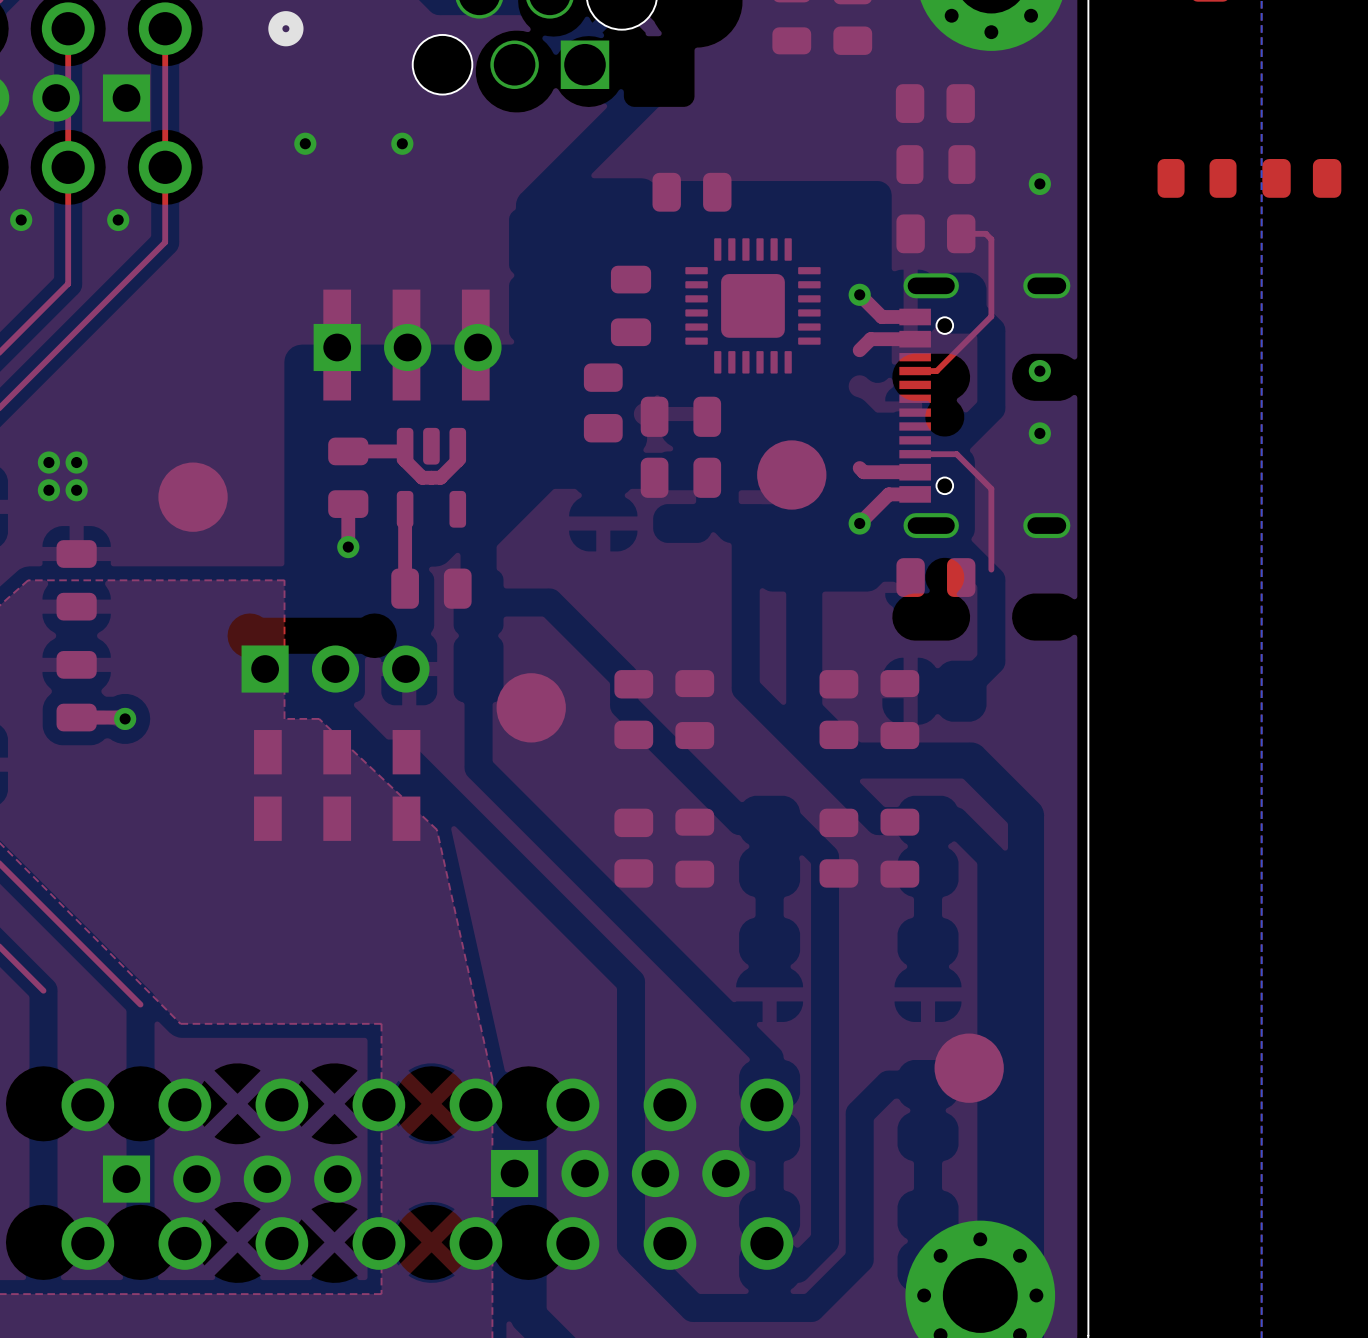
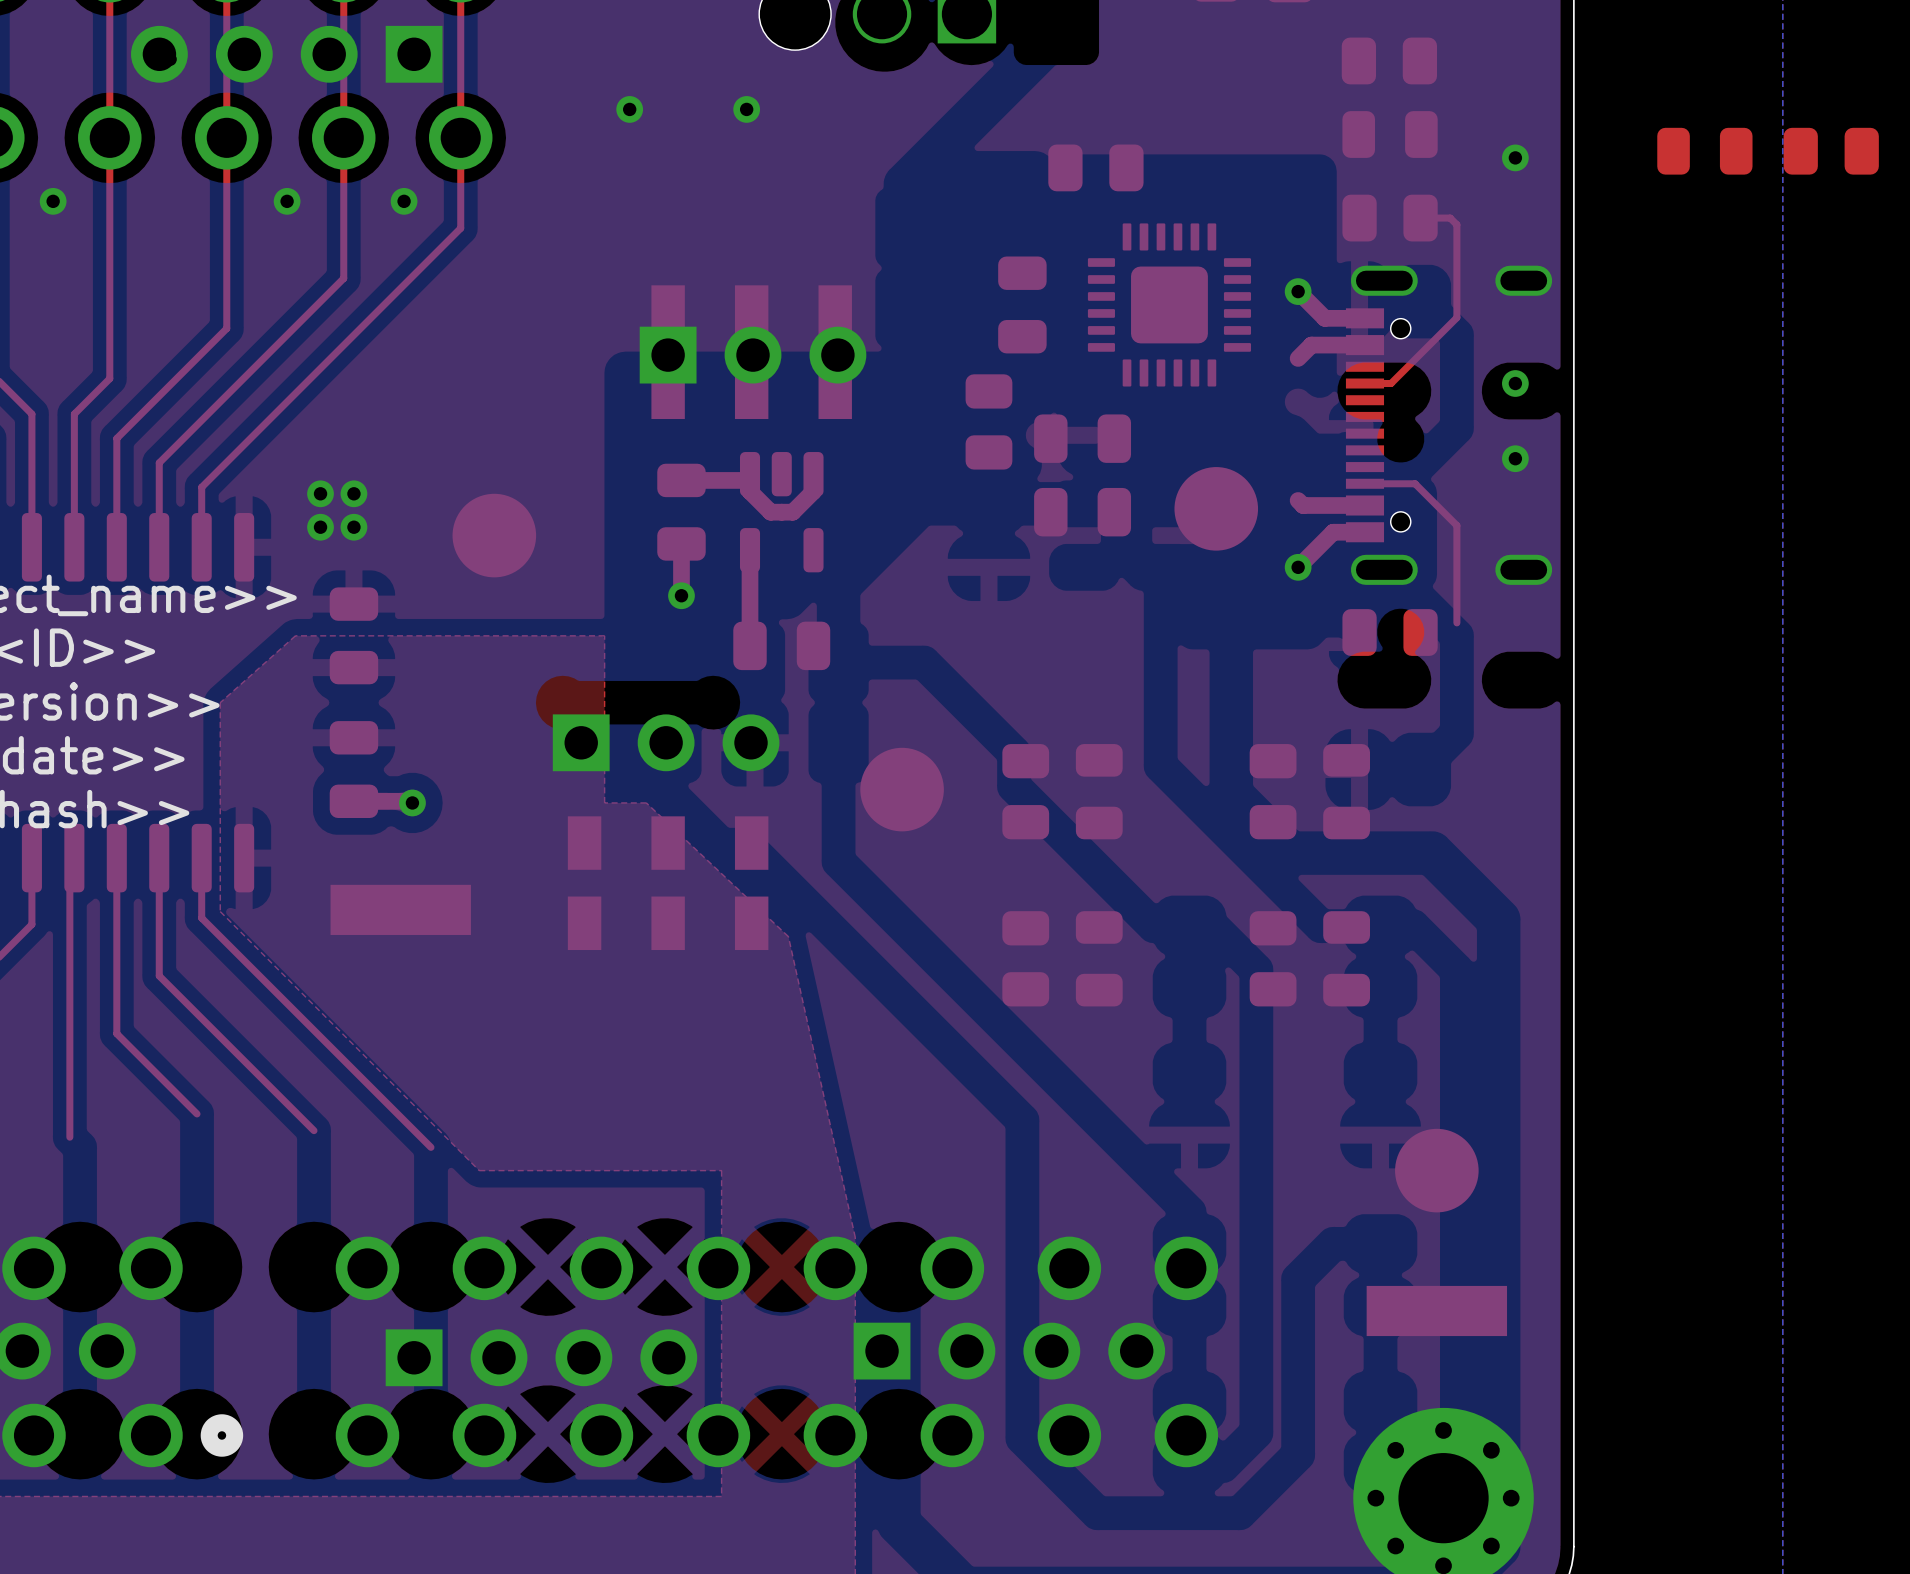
part: none -> (400, 909)
part position: (969, 1068) -> (1436, 1170)
part: none -> (1436, 1310)

